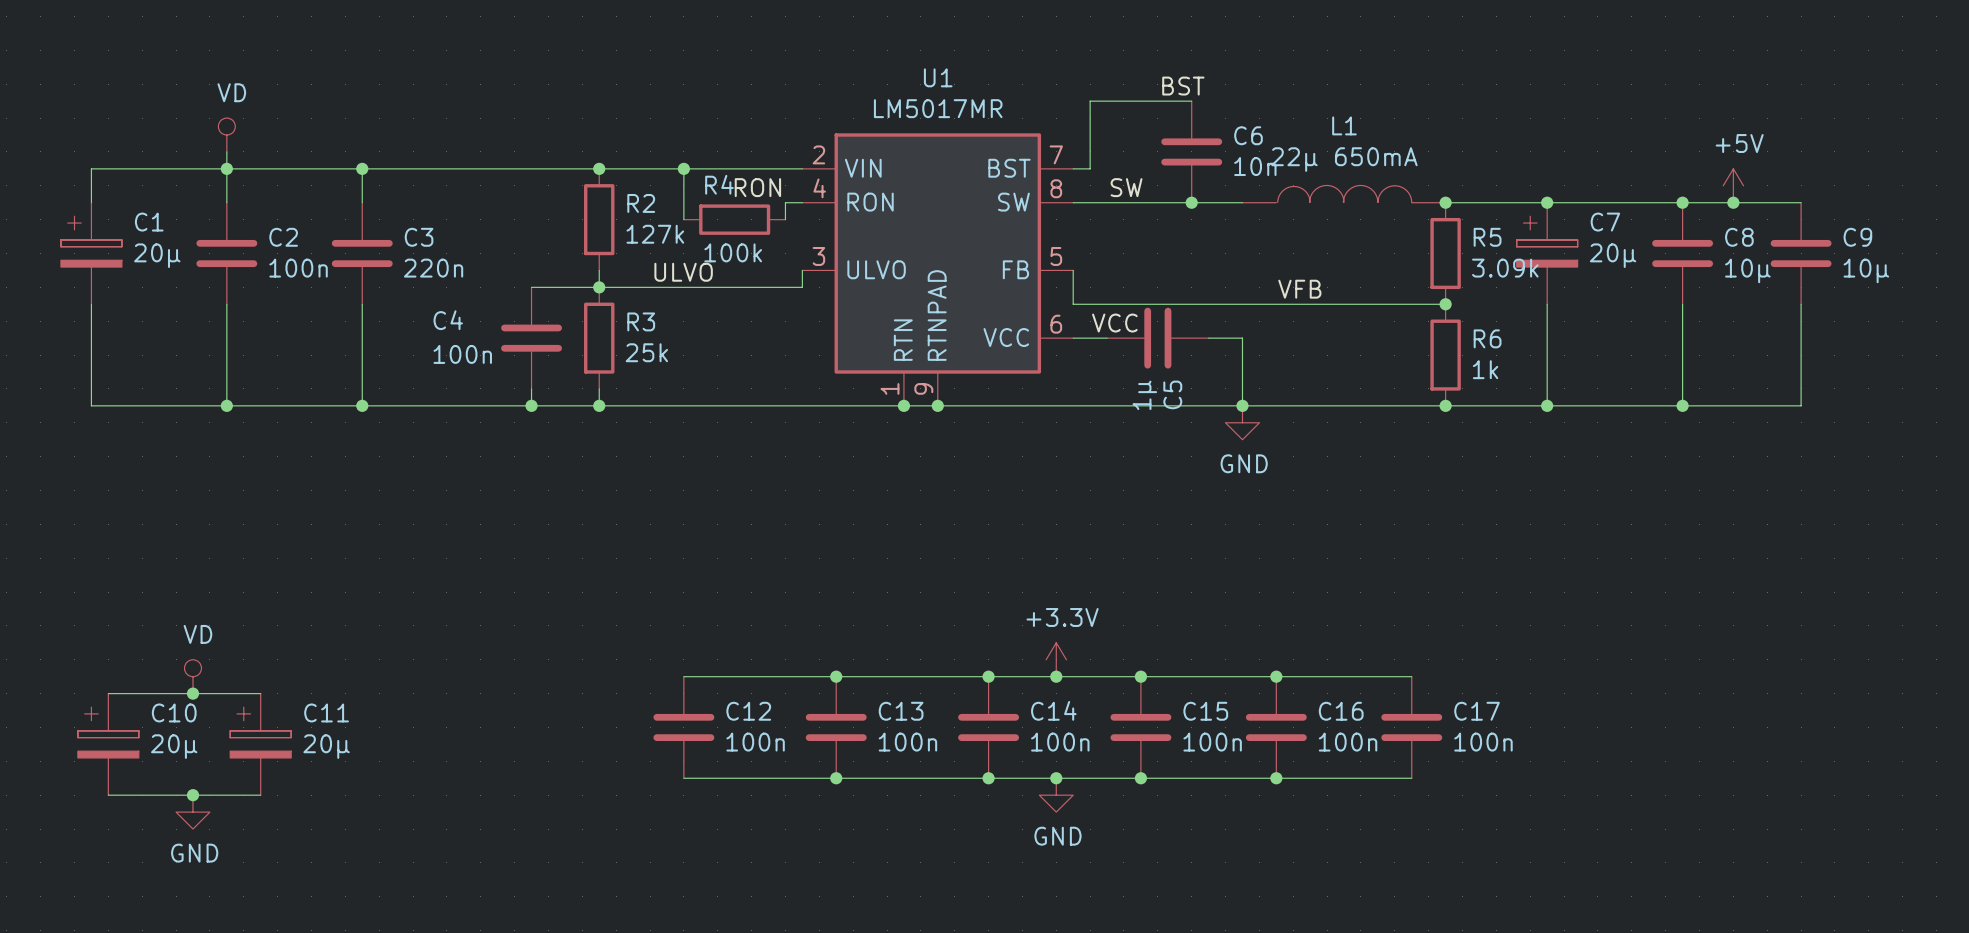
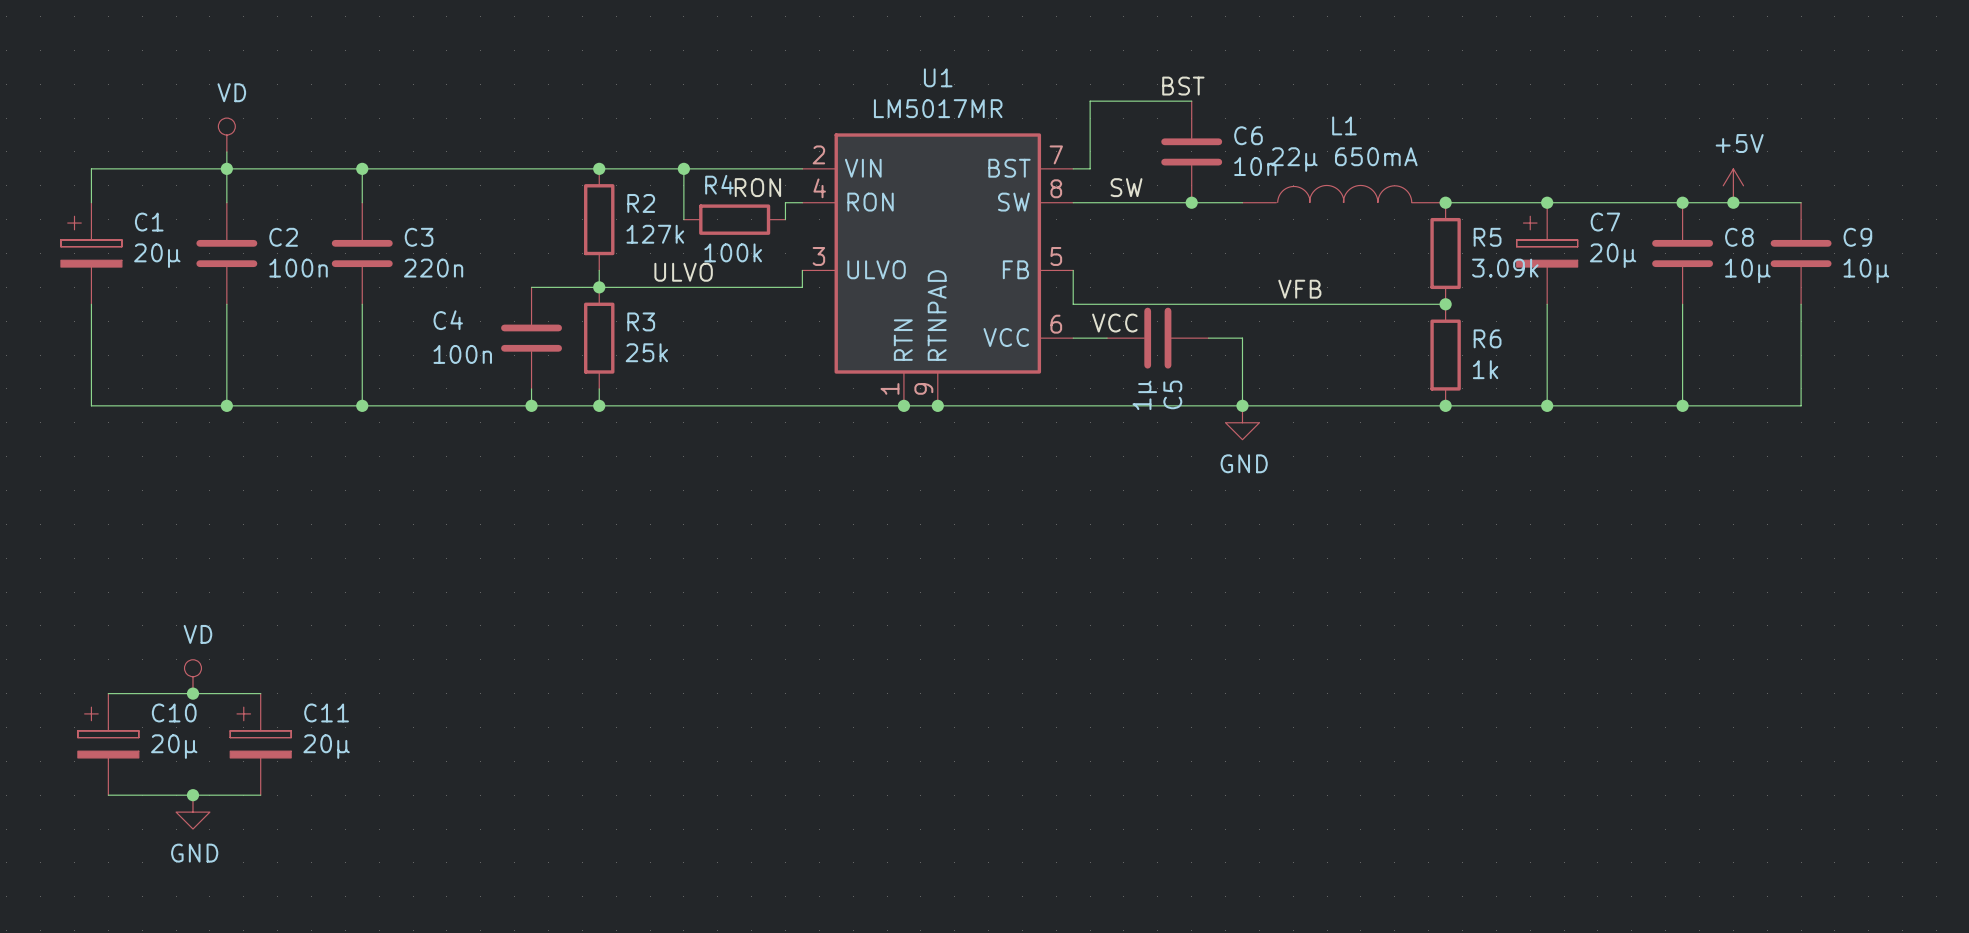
power symbol: +3.3V (1056, 659) -> none
wire: (683, 676) (1411, 676) -> none
junction: (836, 676) -> none
junction: (988, 676) -> none
junction: (1056, 676) -> none
junction: (1140, 676) -> none
junction: (1276, 676) -> none
C12: 100n (683, 727) -> none
C13: 100n (836, 727) -> none
C14: 100n (988, 727) -> none
C15: 100n (1140, 727) -> none
C16: 100n (1276, 727) -> none
C17: 100n (1411, 727) -> none
wire: (683, 778) (1411, 778) -> none
junction: (836, 778) -> none
junction: (988, 778) -> none
junction: (1056, 778) -> none
junction: (1140, 778) -> none
junction: (1276, 778) -> none
power symbol: GND (1056, 795) -> none

